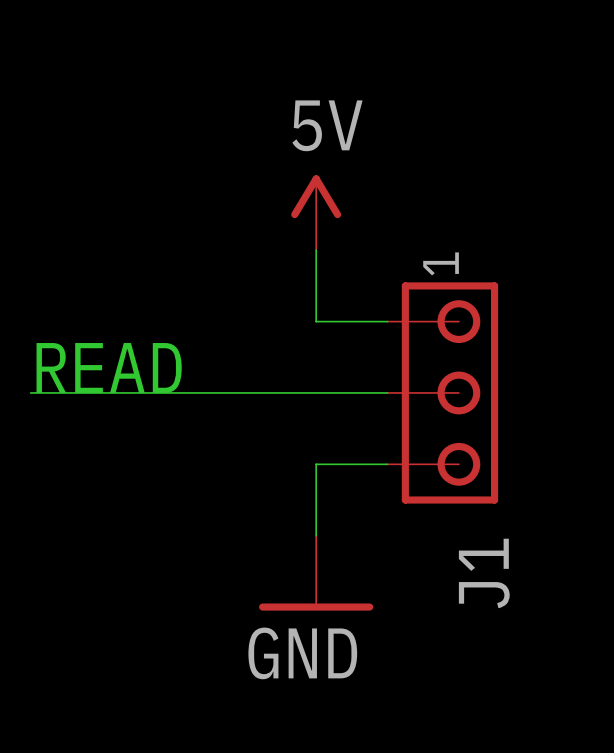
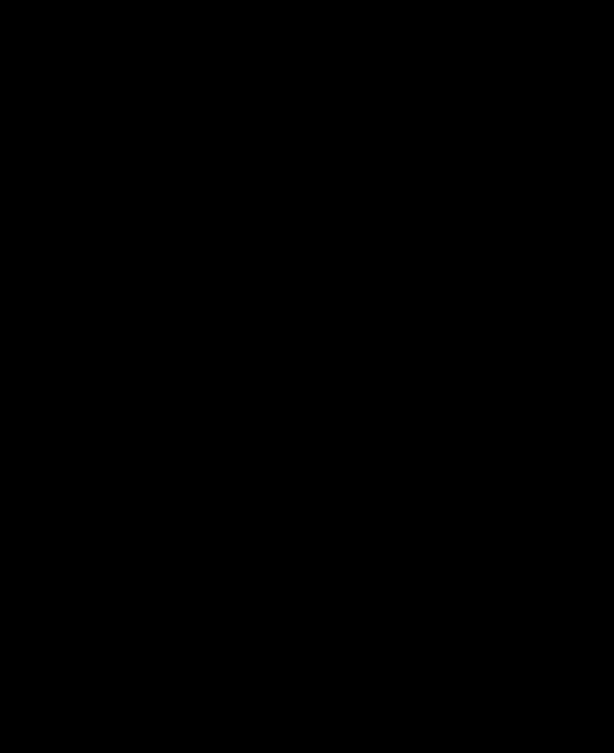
power symbol: 5V (316, 212) -> none
wire: (316, 250) (316, 321) (387, 321) -> none
text: READ (109, 367) -> none
wire: (30, 392) (387, 392) -> none
J1: (442, 392) -> none
wire: (387, 464) (316, 464) (316, 535) -> none
power symbol: GND (316, 573) -> none

